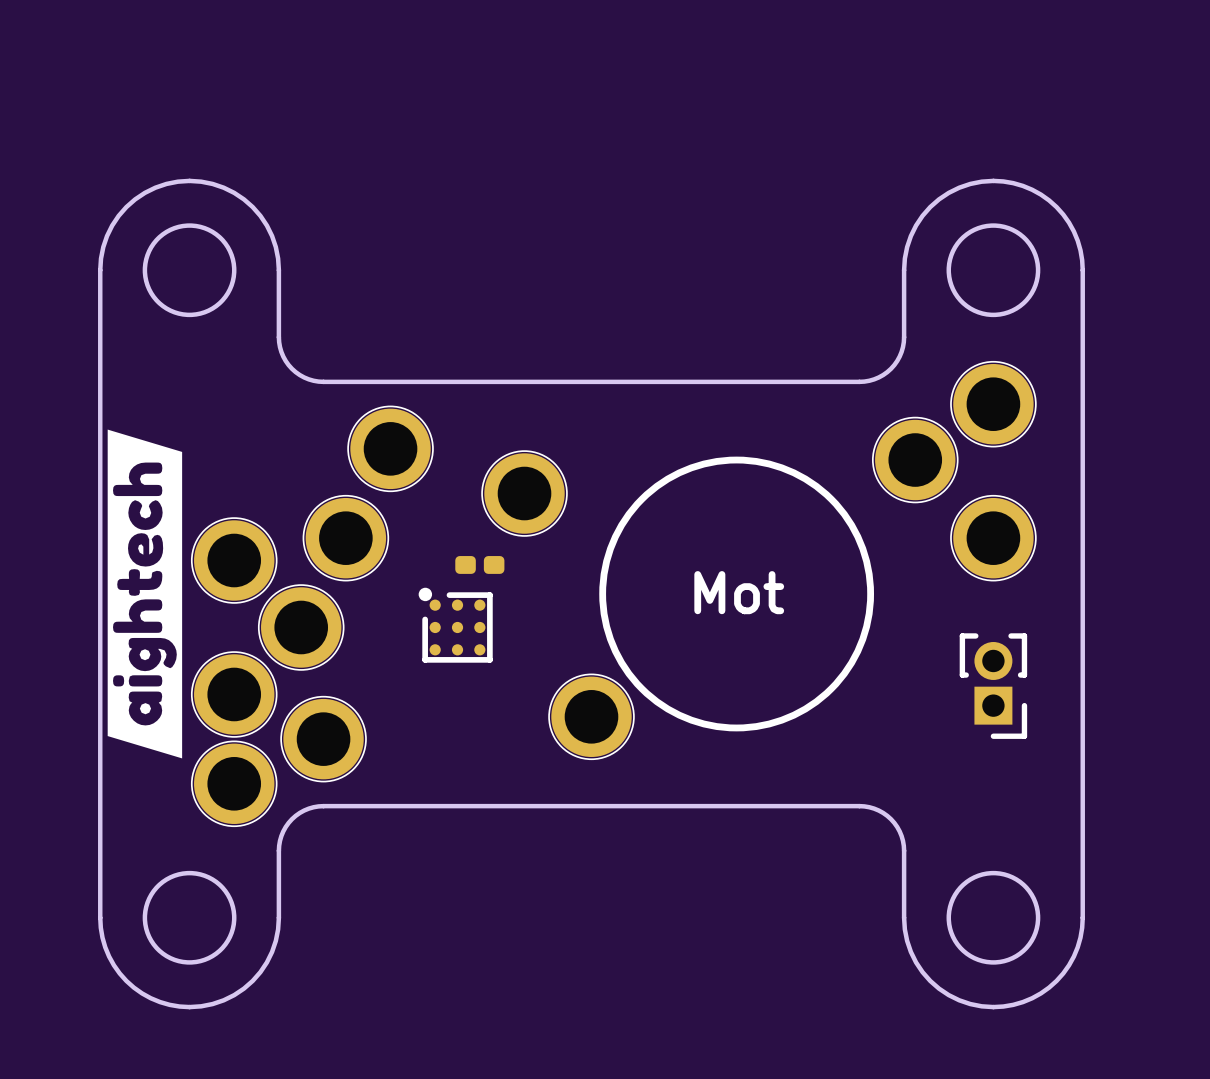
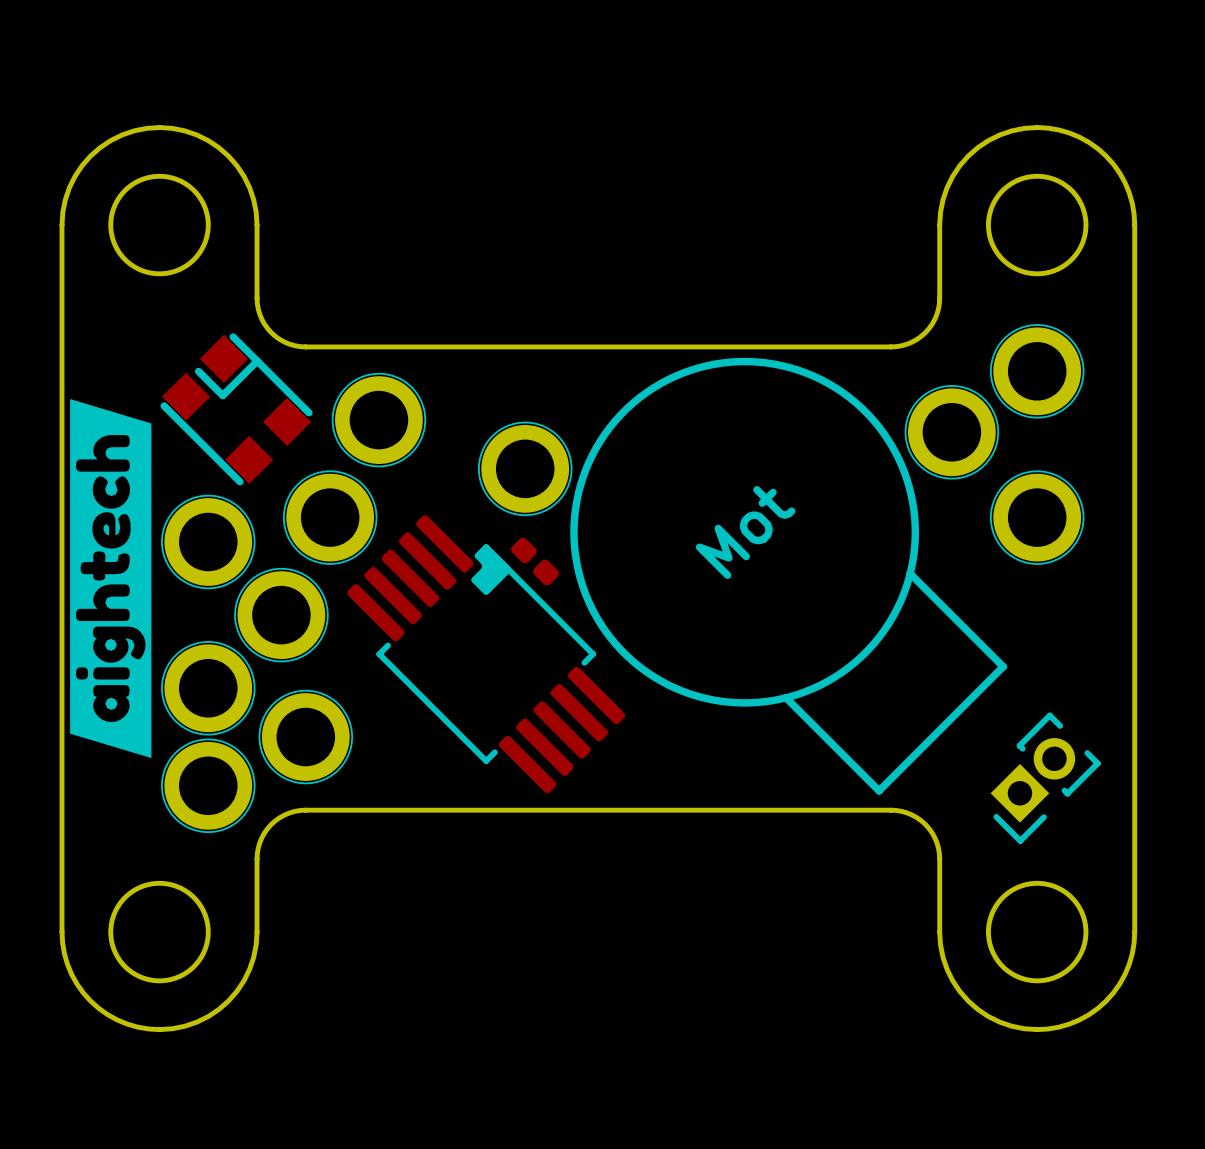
part: none -> (236, 409)
drawing shape: [599, 456, 875, 732] -> [570, 357, 1007, 795]
part: (479, 564) -> none
part: none -> (534, 561)
text: Mot (739, 592) -> none
part: (455, 625) -> none
part: none -> (486, 654)
drawing: [548, 673, 635, 761] -> none
part: (993, 686) -> none
part: (591, 716) -> none
part: none -> (1045, 778)

